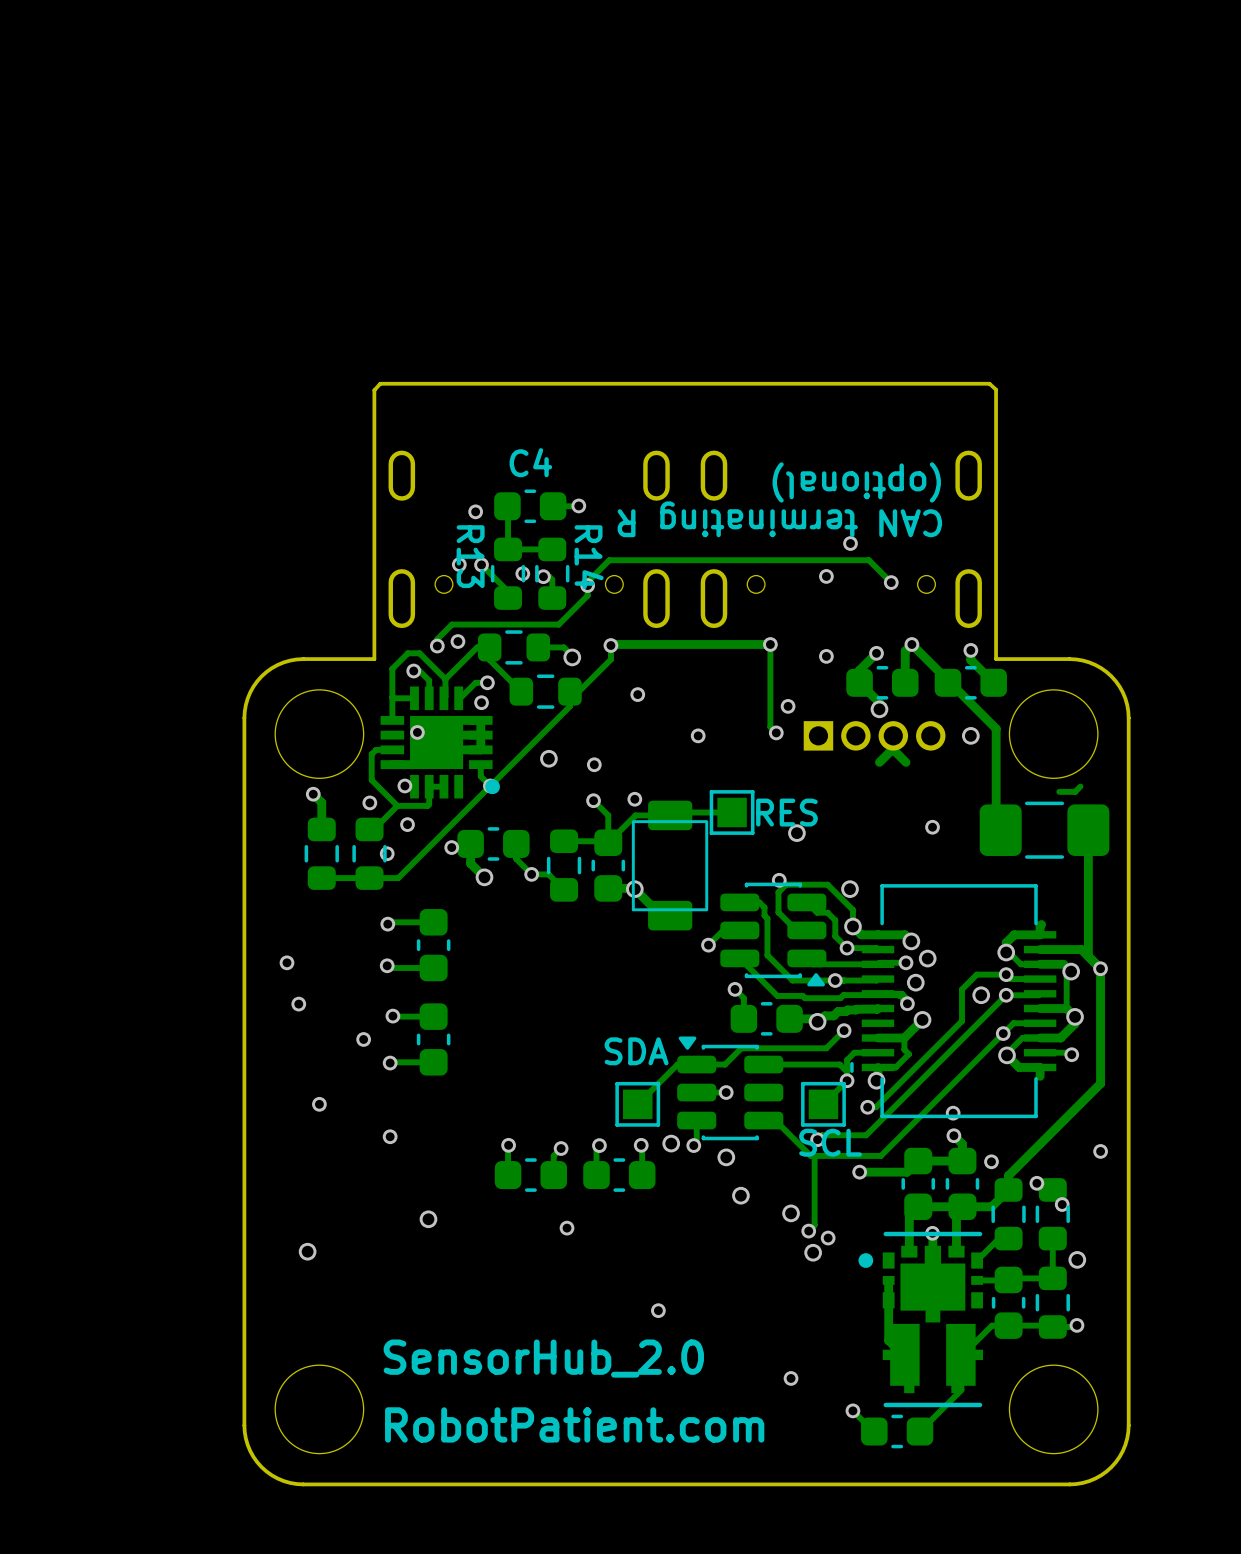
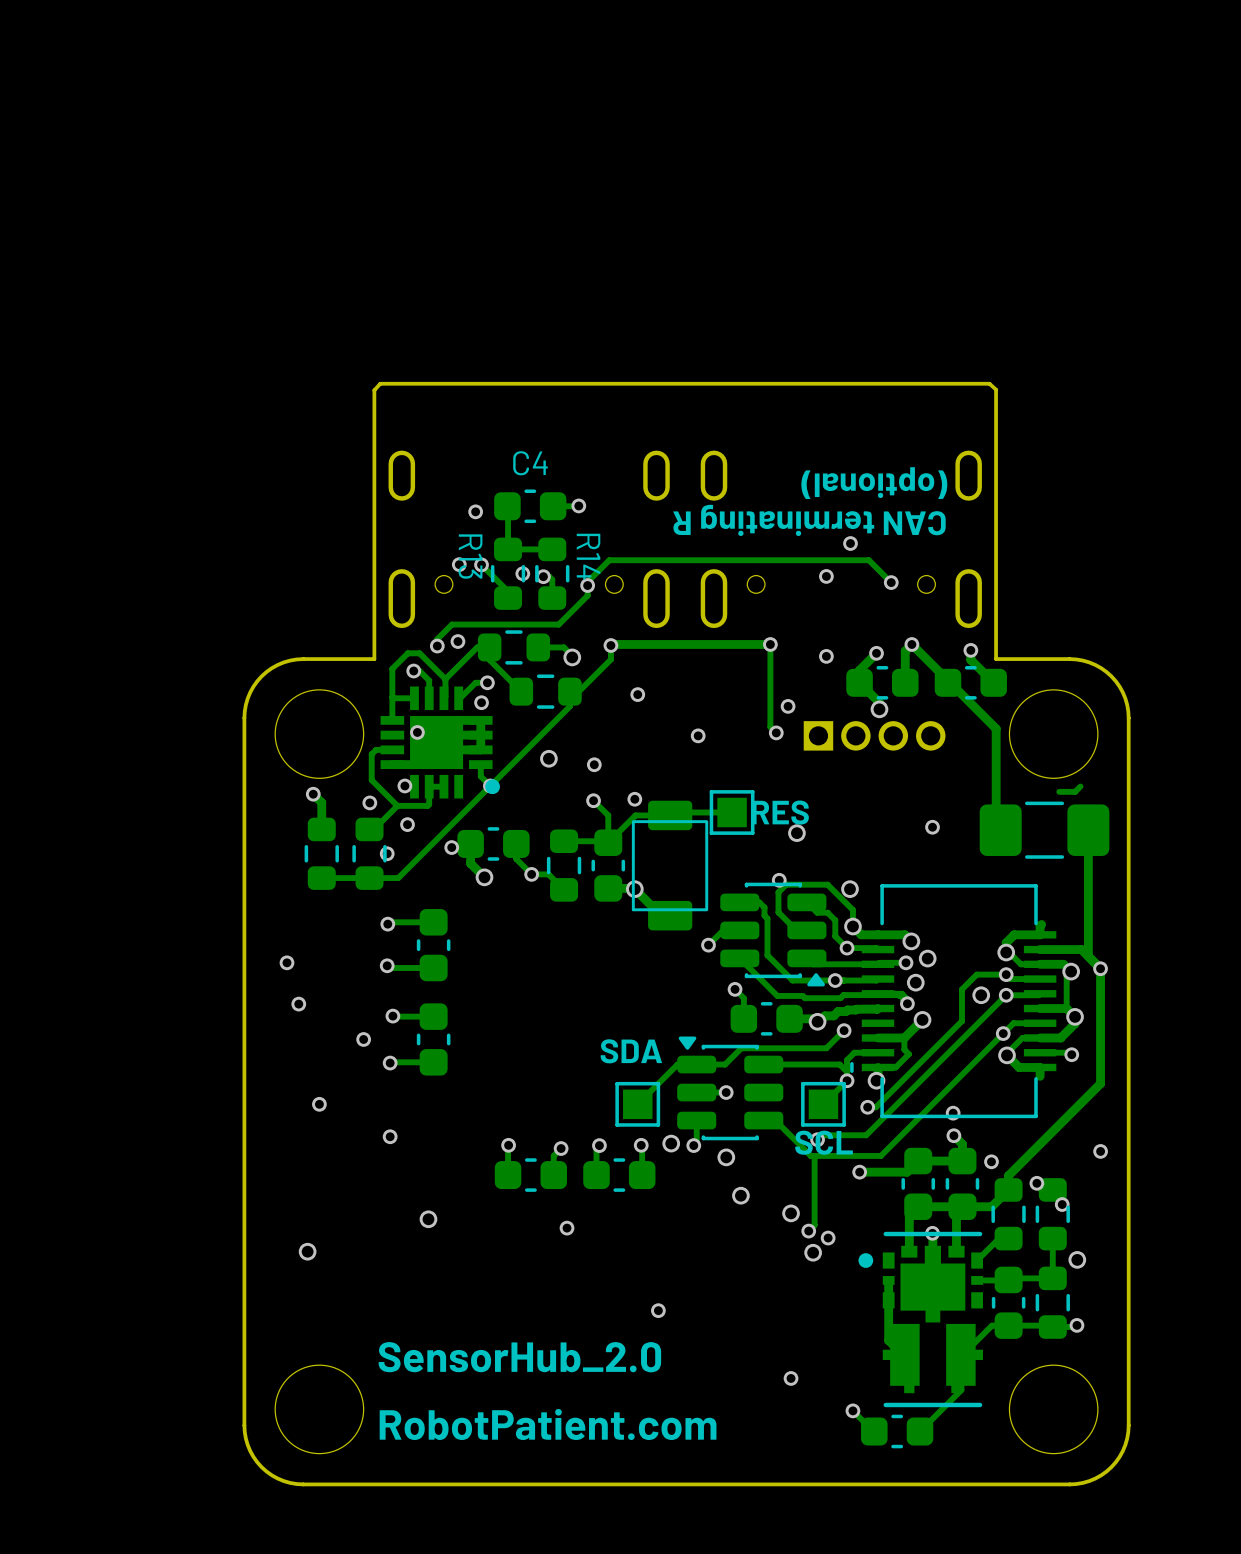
track: (893, 735) (893, 748) (879, 762) -> none
via: (970, 735) -> none
track: (893, 749) (906, 762) -> none

